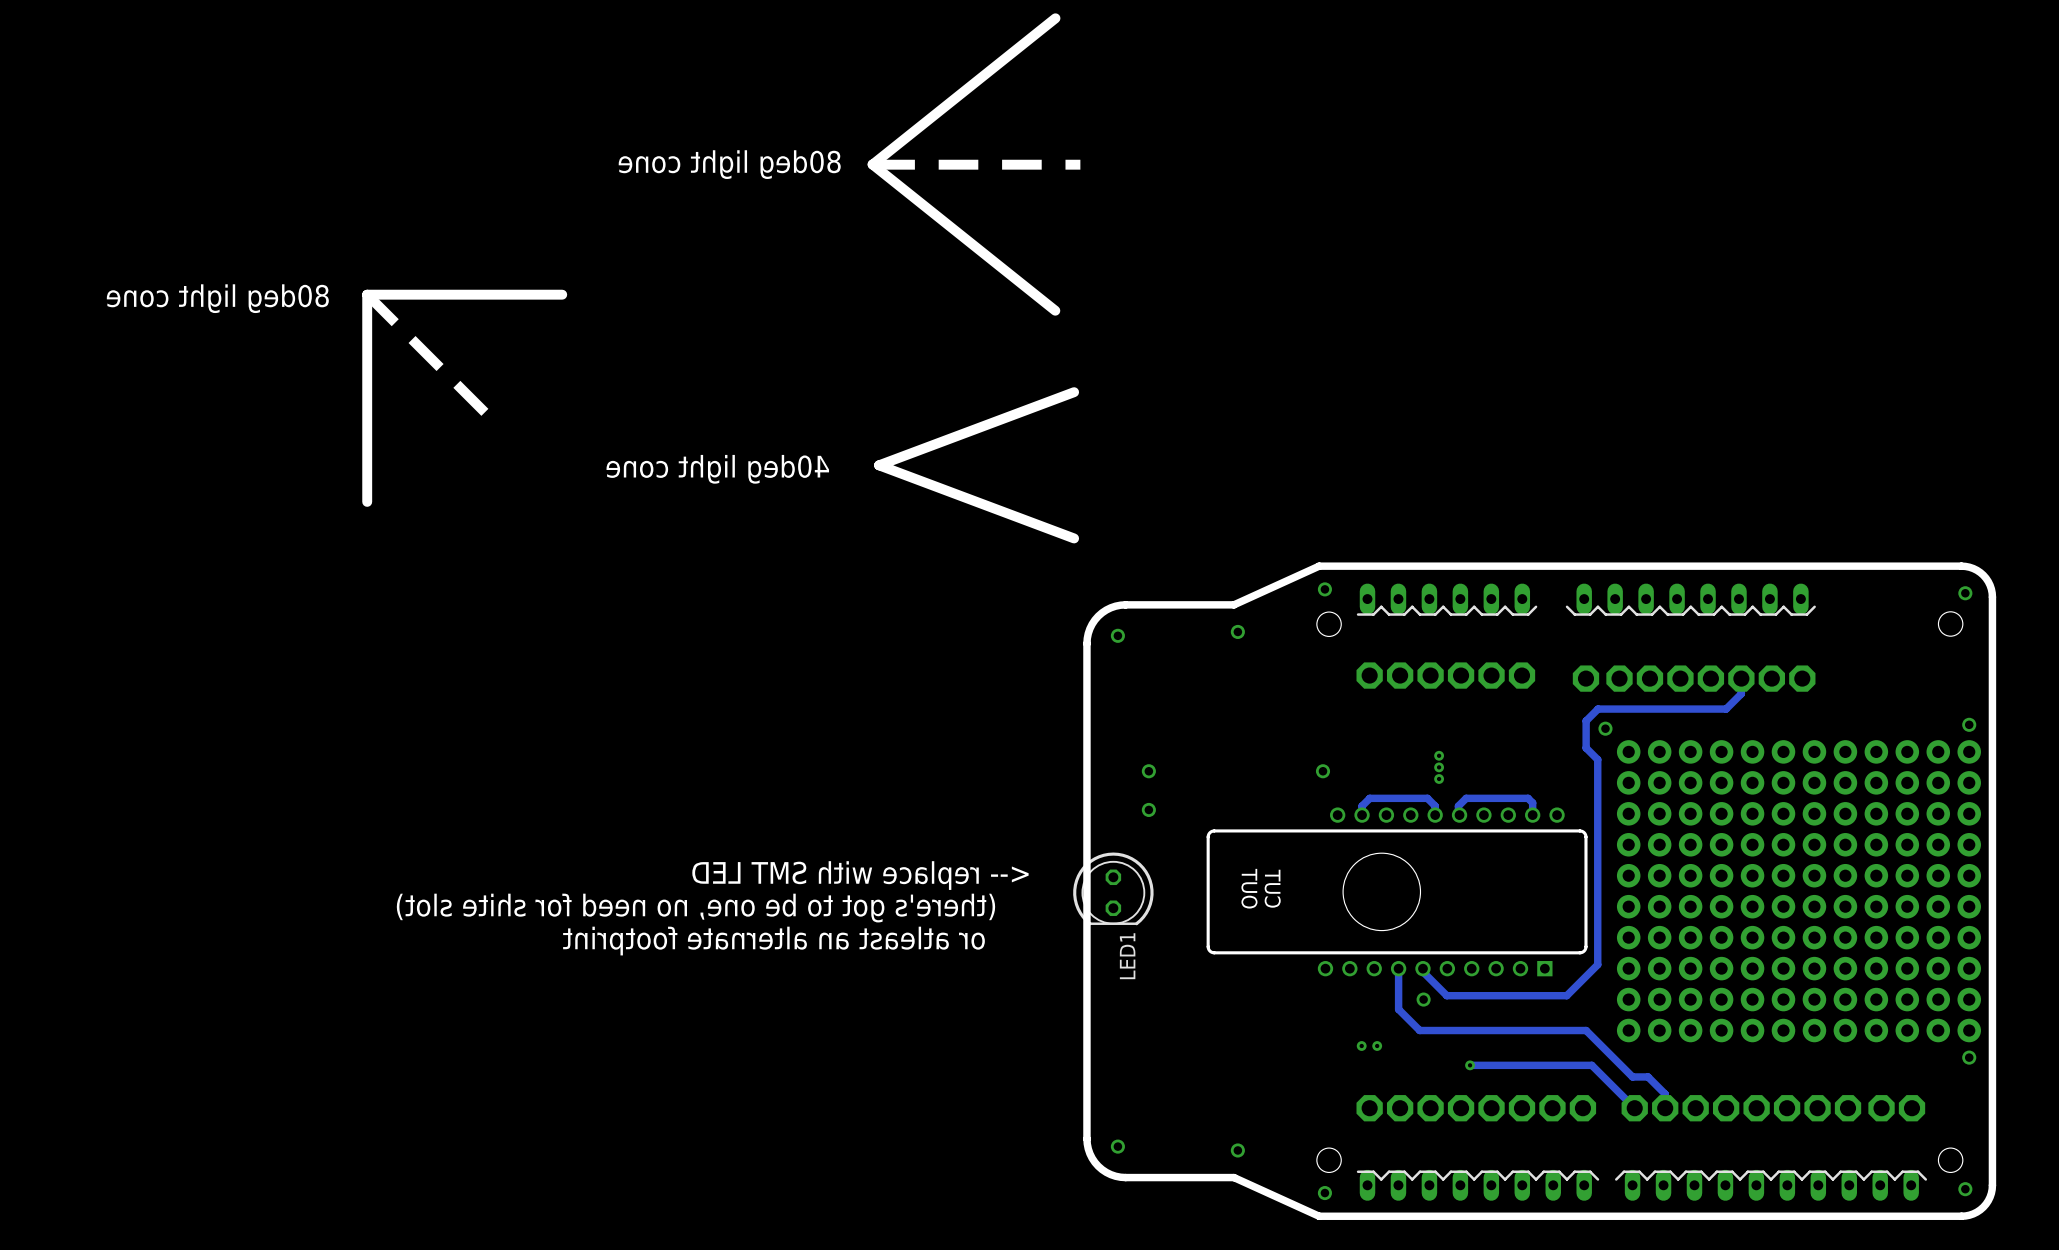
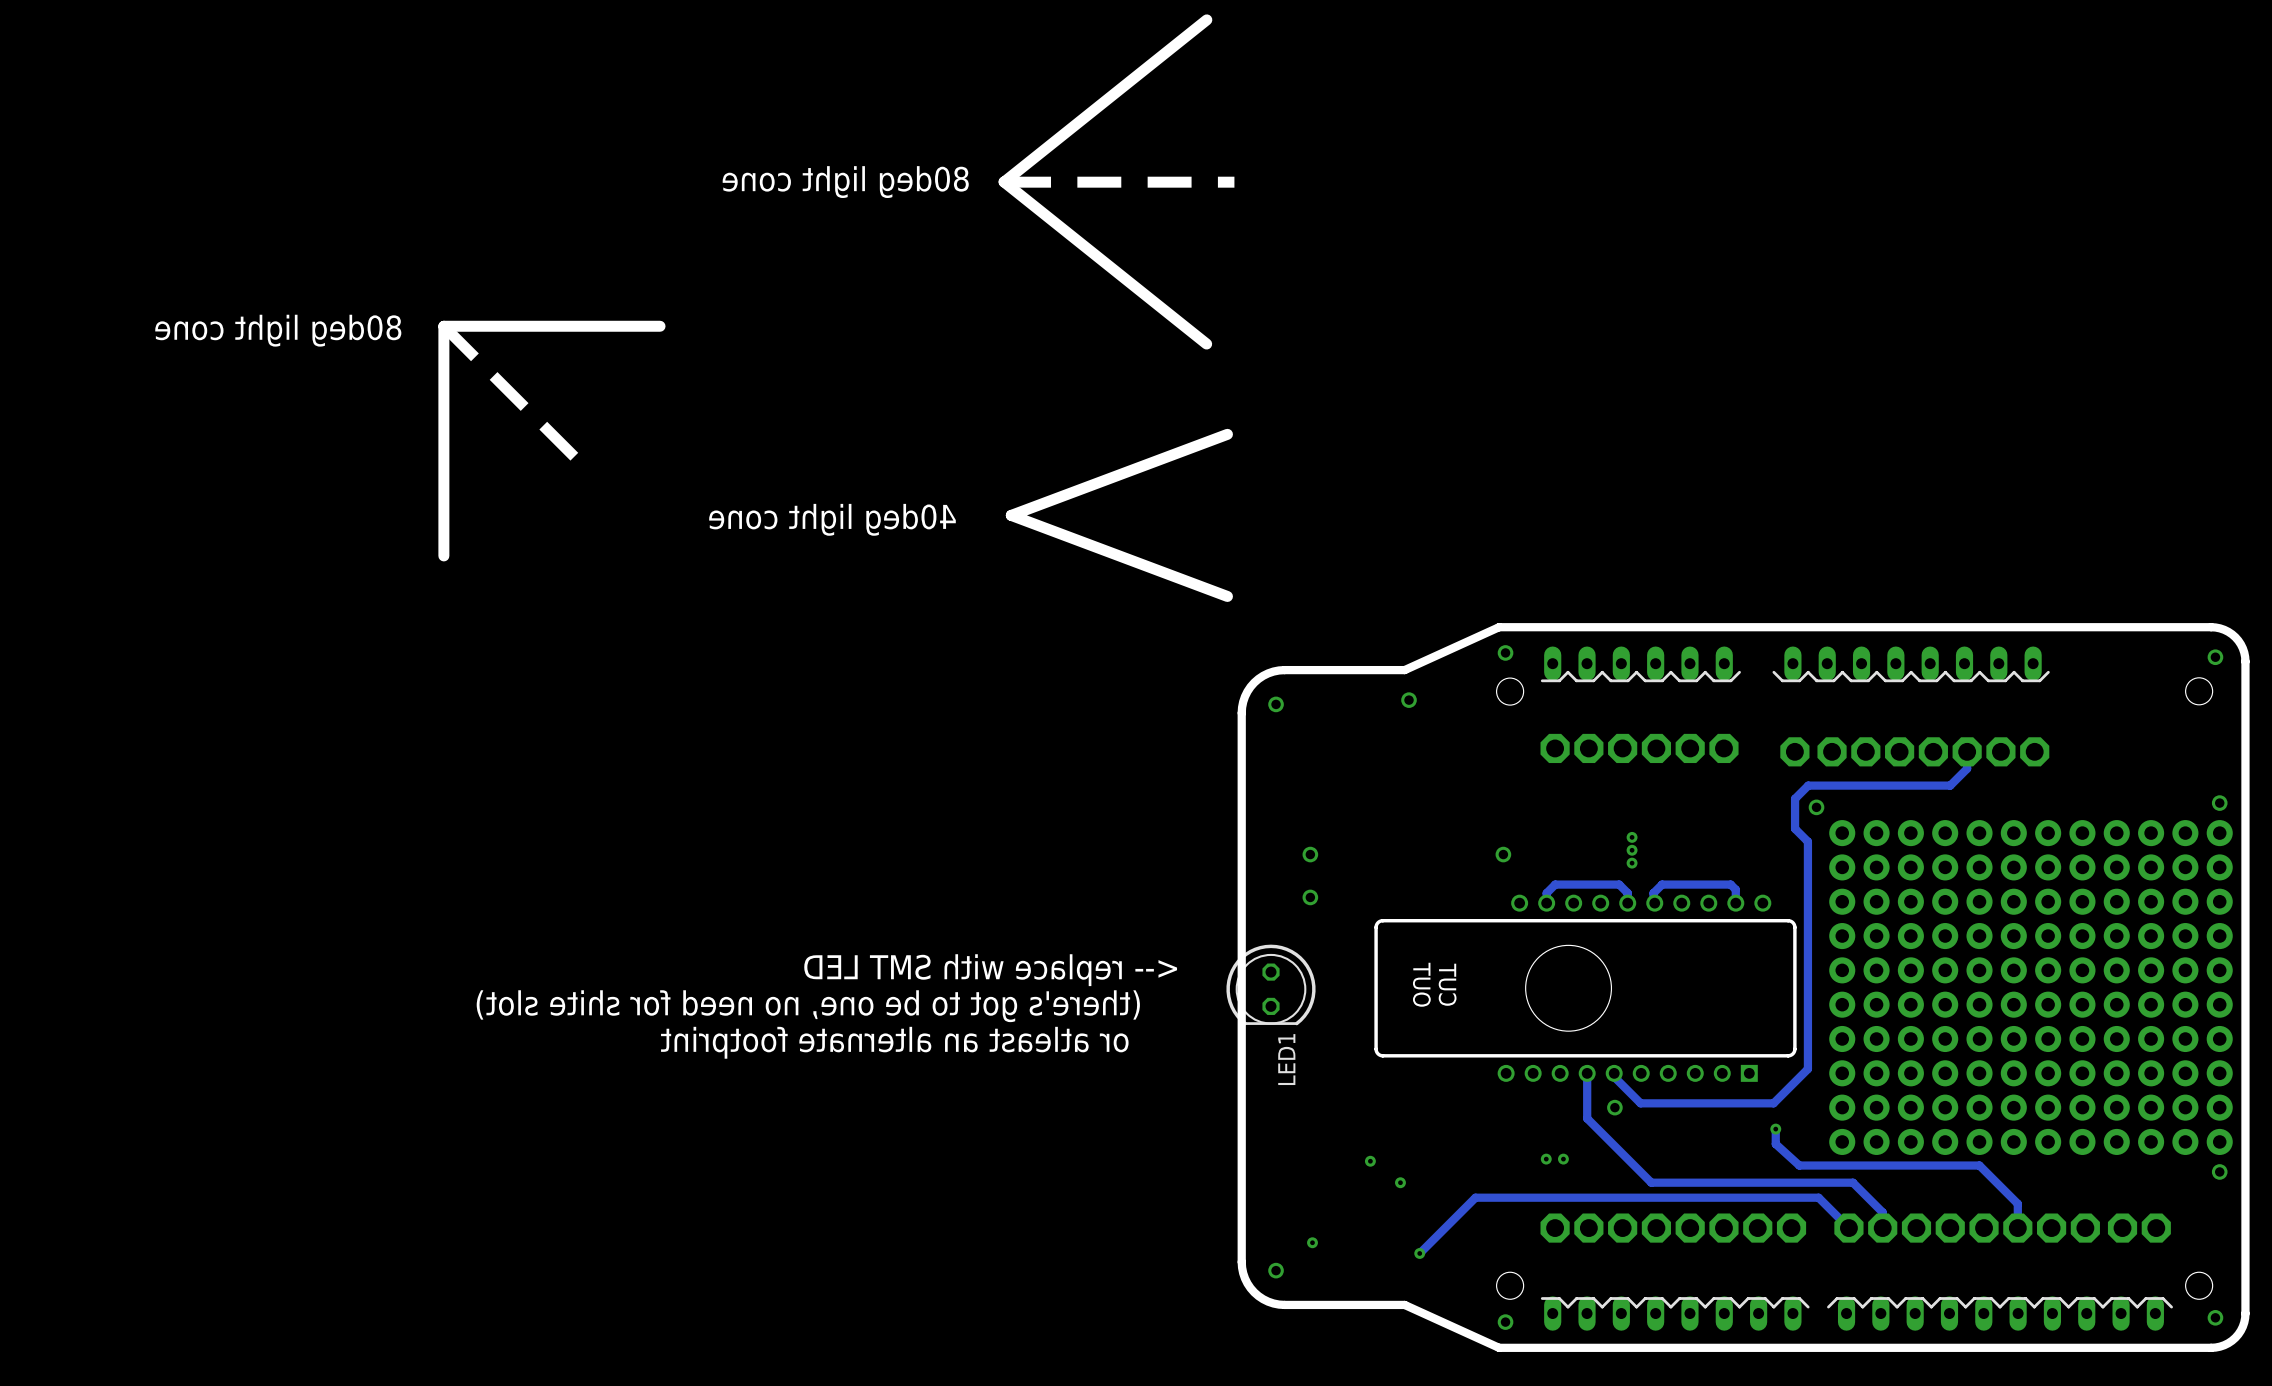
track: none -> (1775, 1129) (1775, 1144) (1799, 1165) (1979, 1165) (2017, 1203) (2017, 1228)
via: none -> (1775, 1129)
track: (1419, 1030) (1586, 1030) (1632, 1076) (1648, 1076) -> (1610, 1141) (1651, 1182) (1852, 1182) (1863, 1193)
via: none -> (1370, 1161)
track: (1470, 1065) (1591, 1065) (1634, 1108) -> (1419, 1253) (1475, 1197) (1818, 1197) (1848, 1227)
via: (1470, 1065) -> none
via: none -> (1400, 1182)
via: none -> (1312, 1242)
via: none -> (1419, 1253)
via: (1237, 1150) -> none

